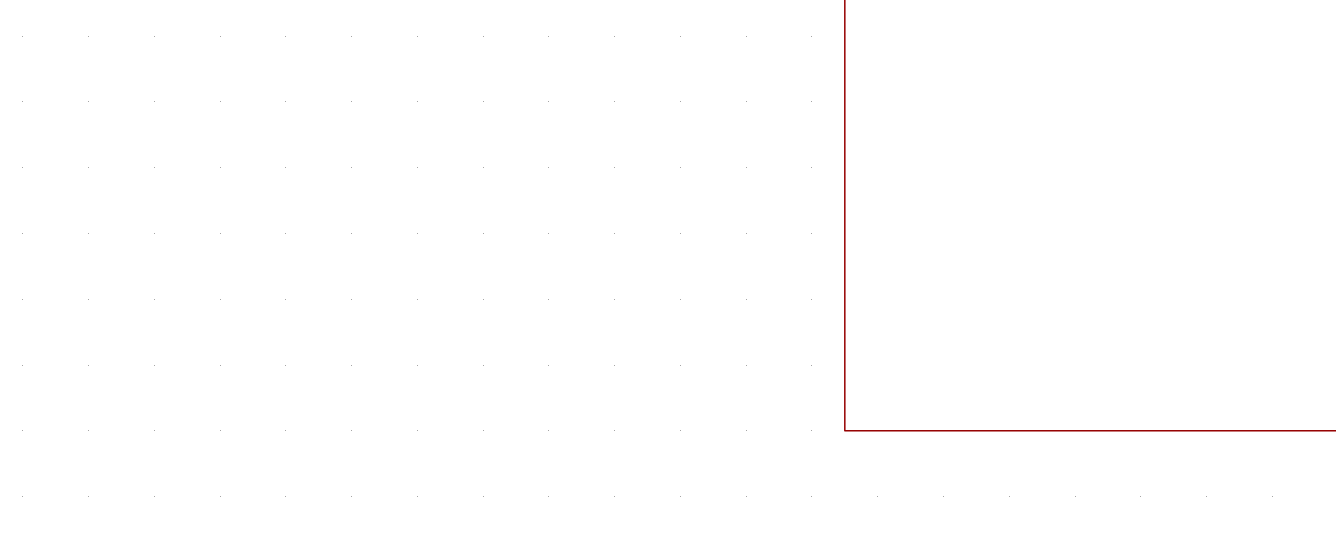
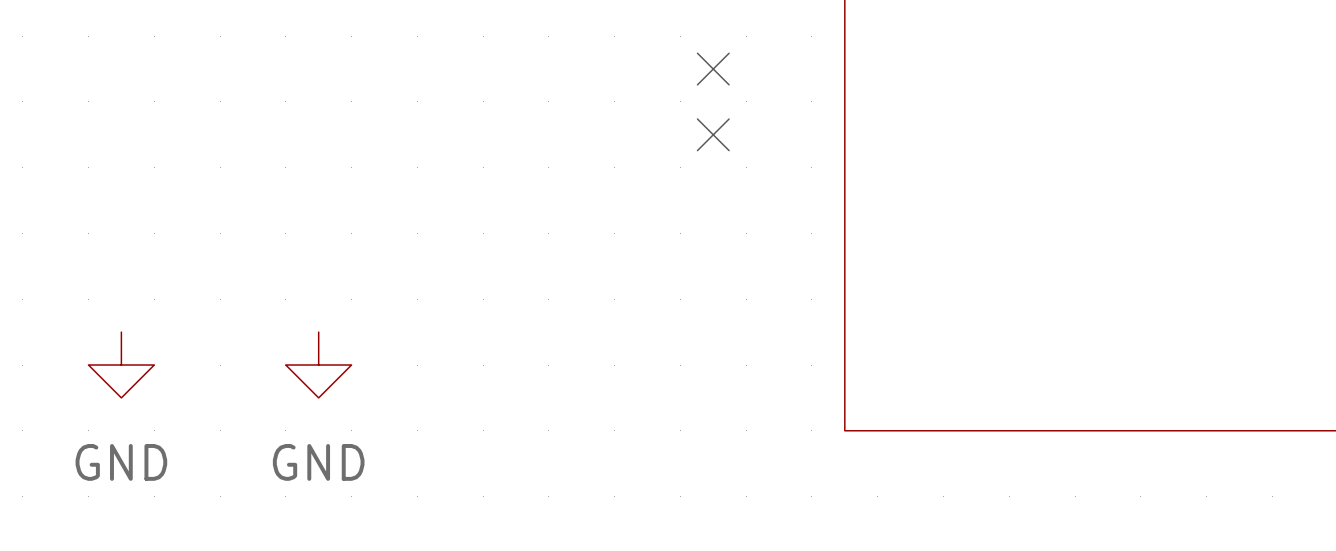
no-connect mark: none -> (713, 69)
no-connect mark: none -> (713, 134)
power symbol: none -> GND (121, 365)
power symbol: none -> GND (318, 365)

